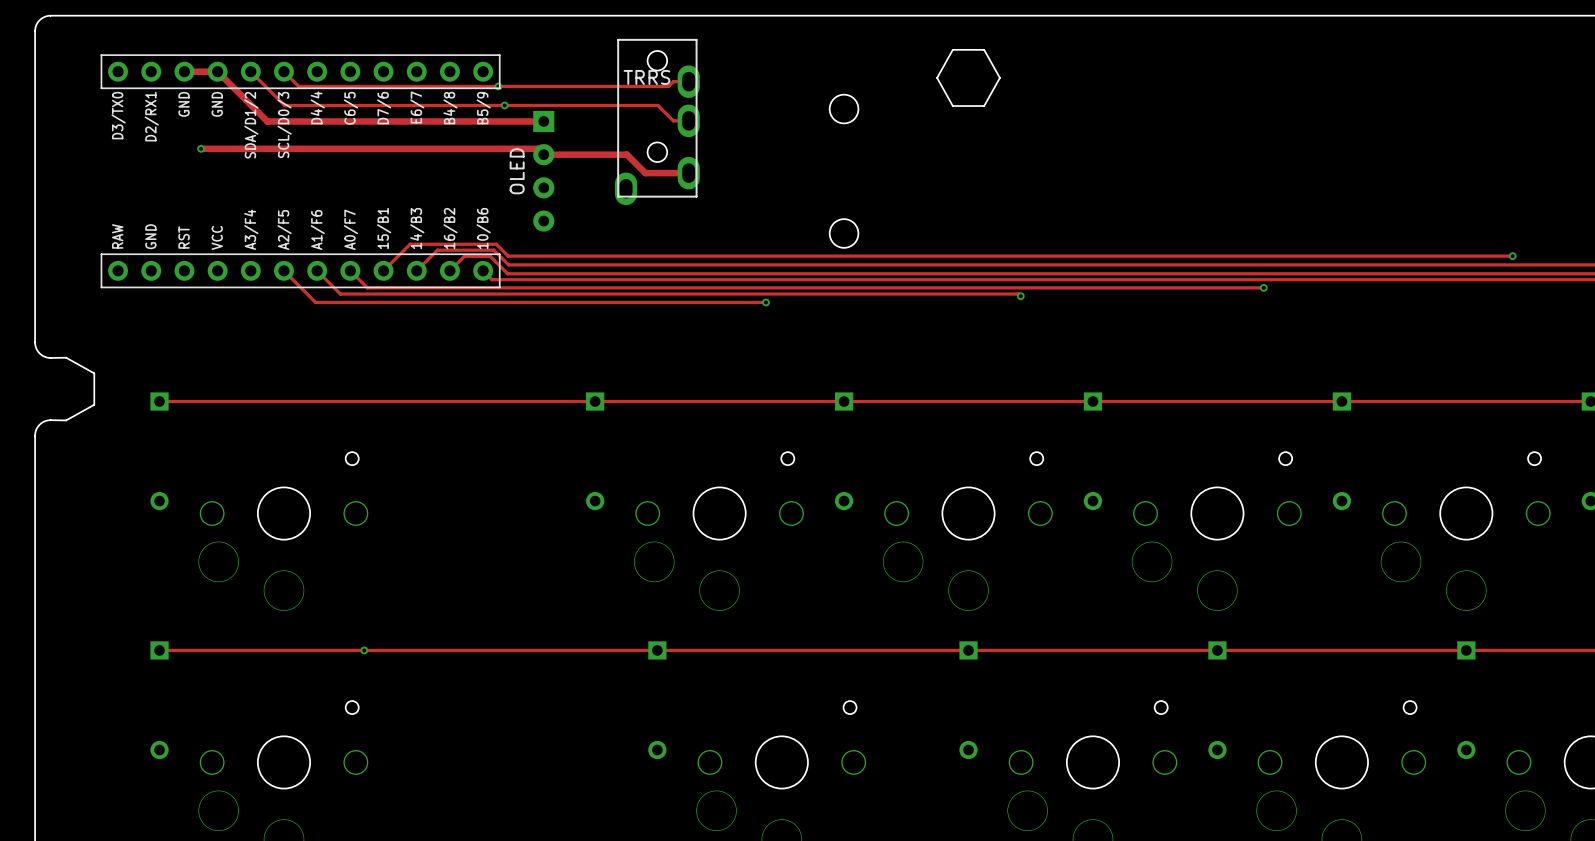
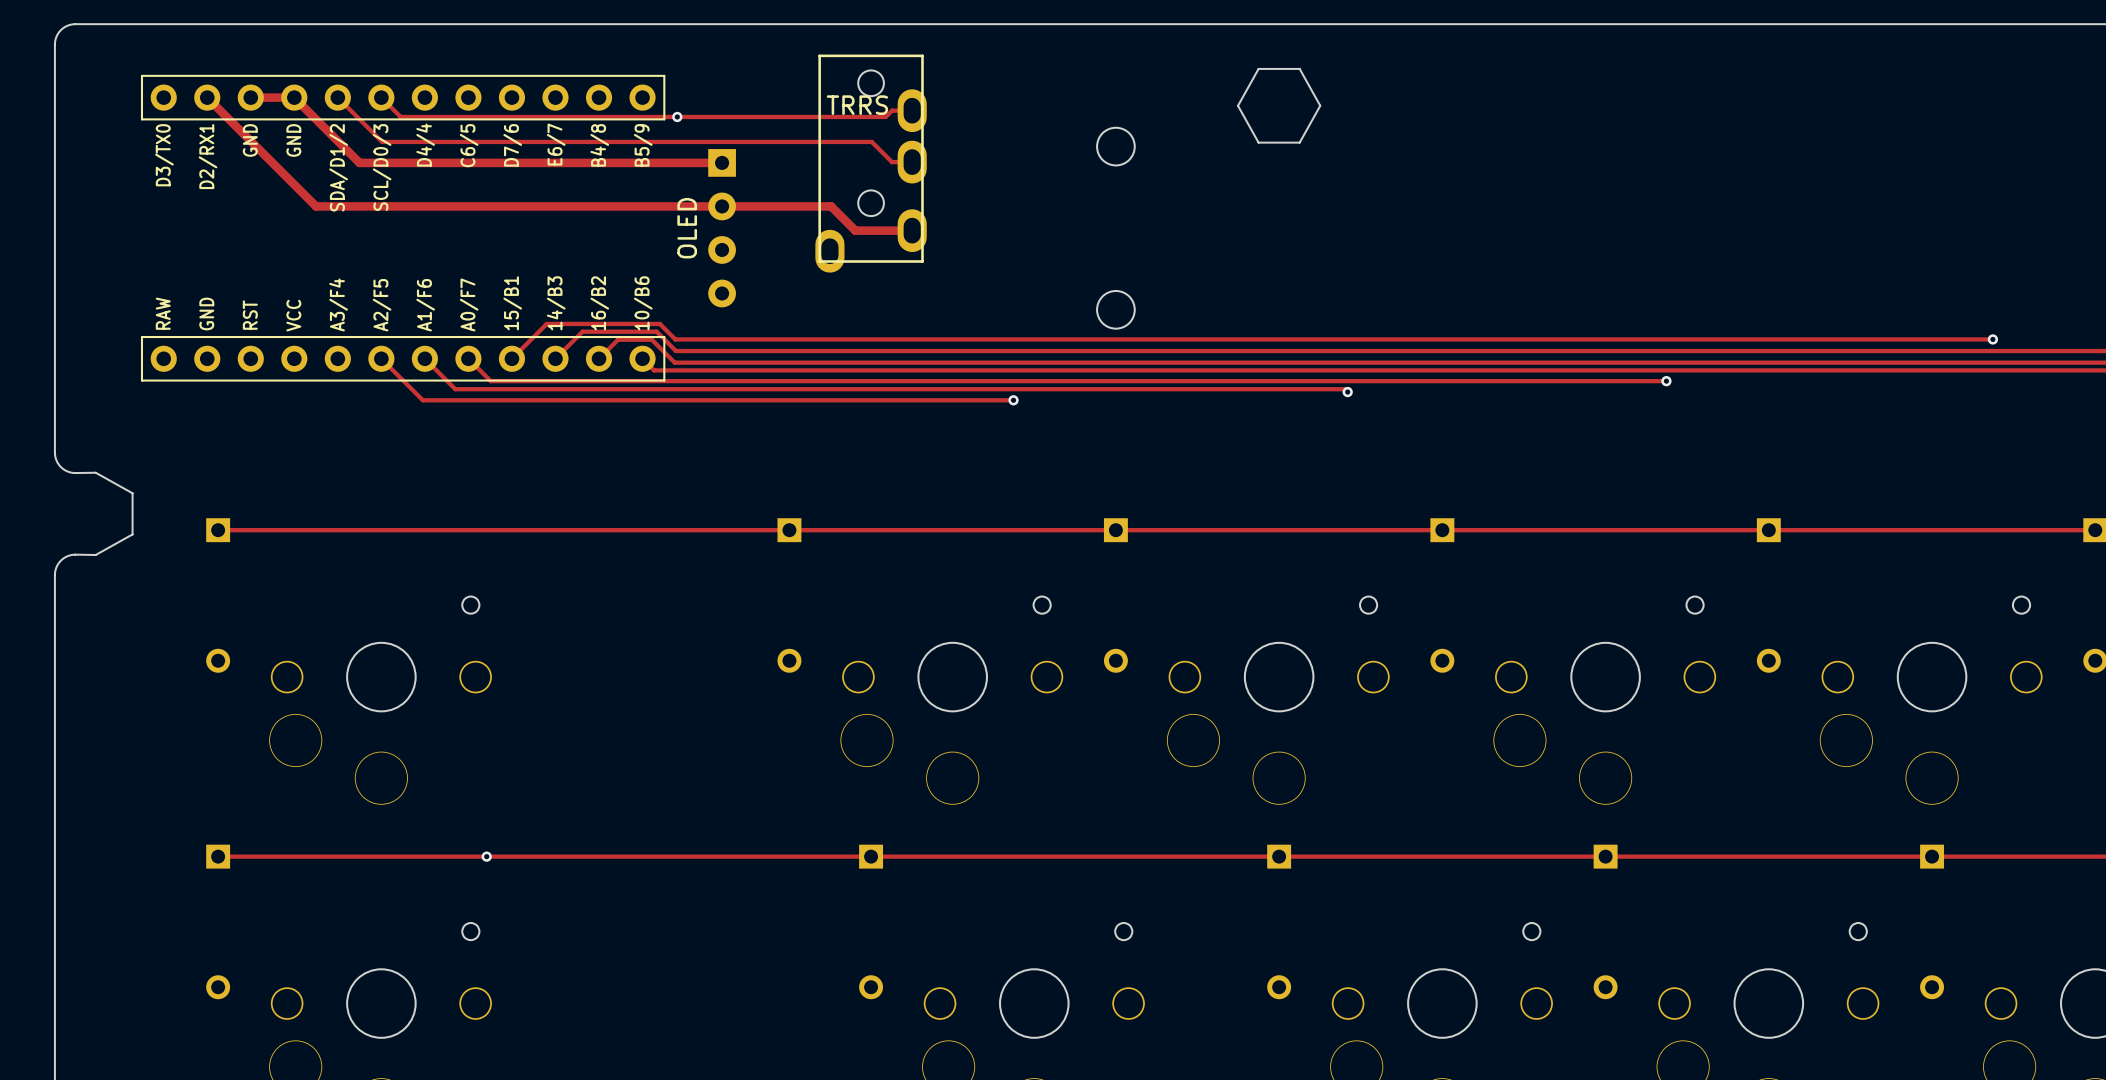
via: (498, 86) -> none
via: none -> (677, 116)
via: (504, 105) -> none
track: (201, 148) (537, 148) (543, 154) -> (207, 97) (316, 206) (722, 206)
via: (201, 148) -> none

